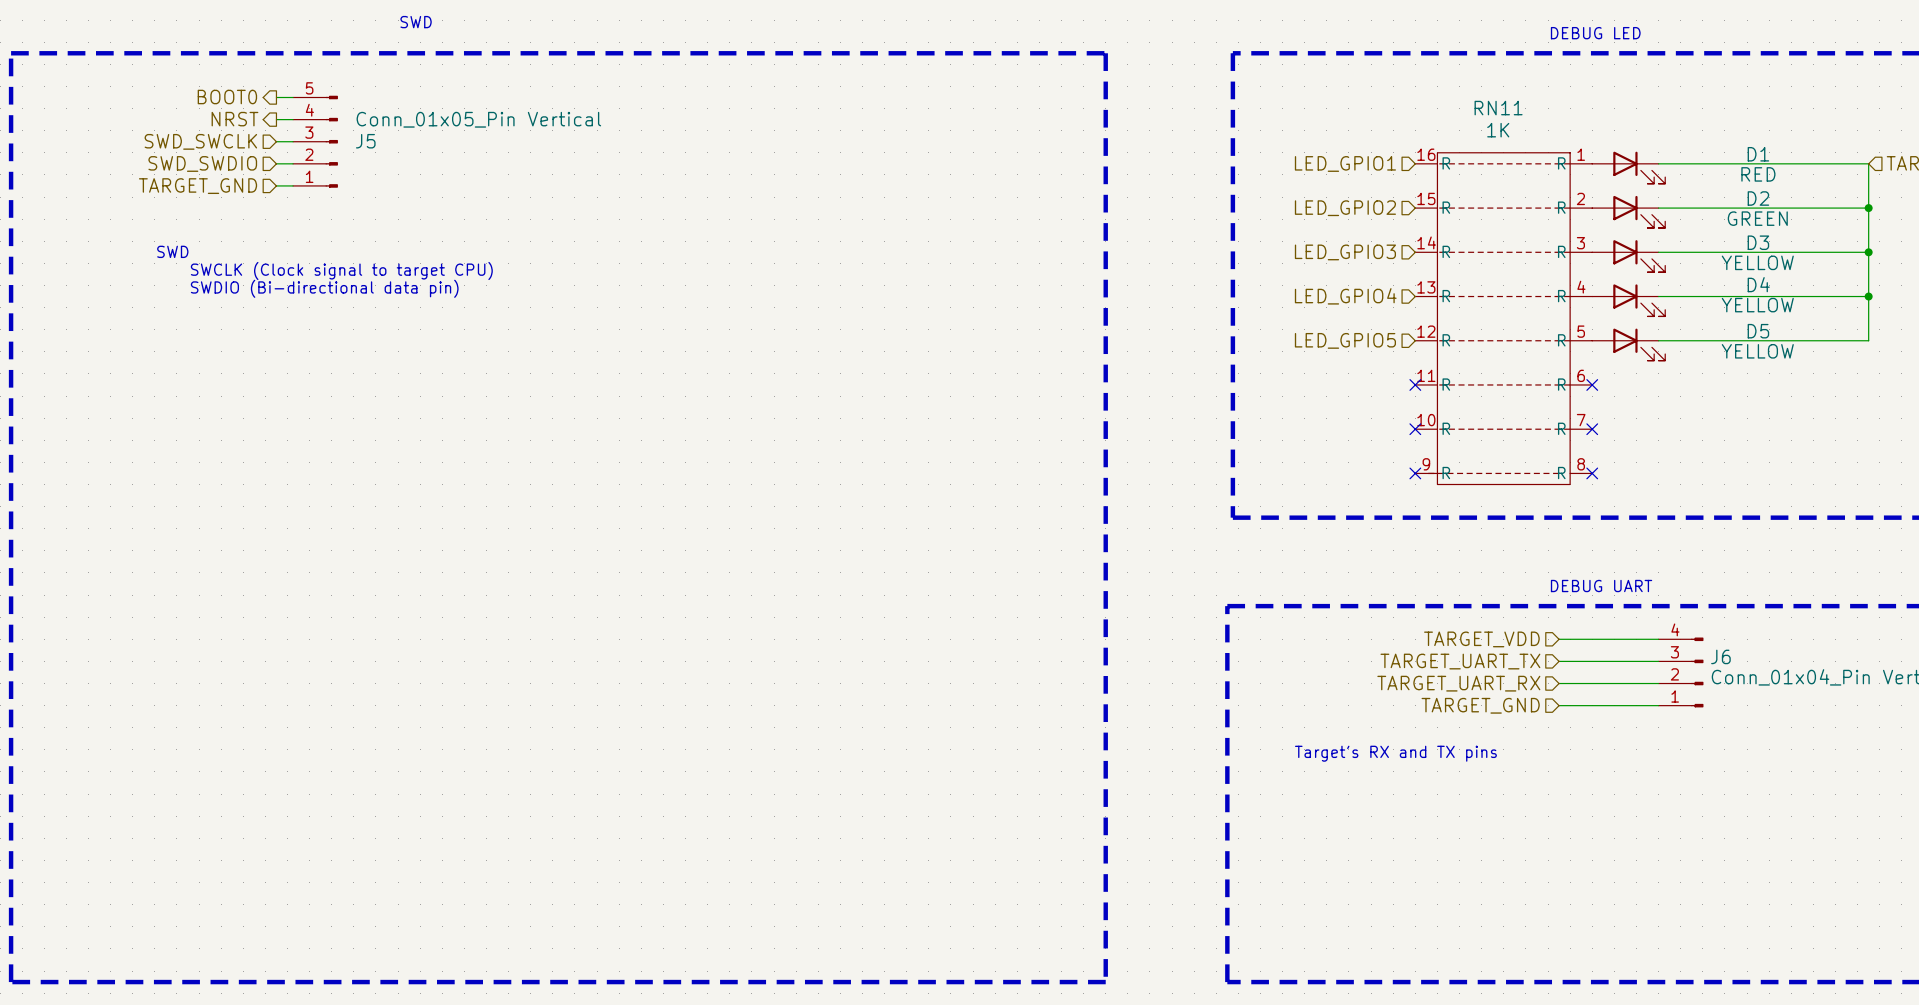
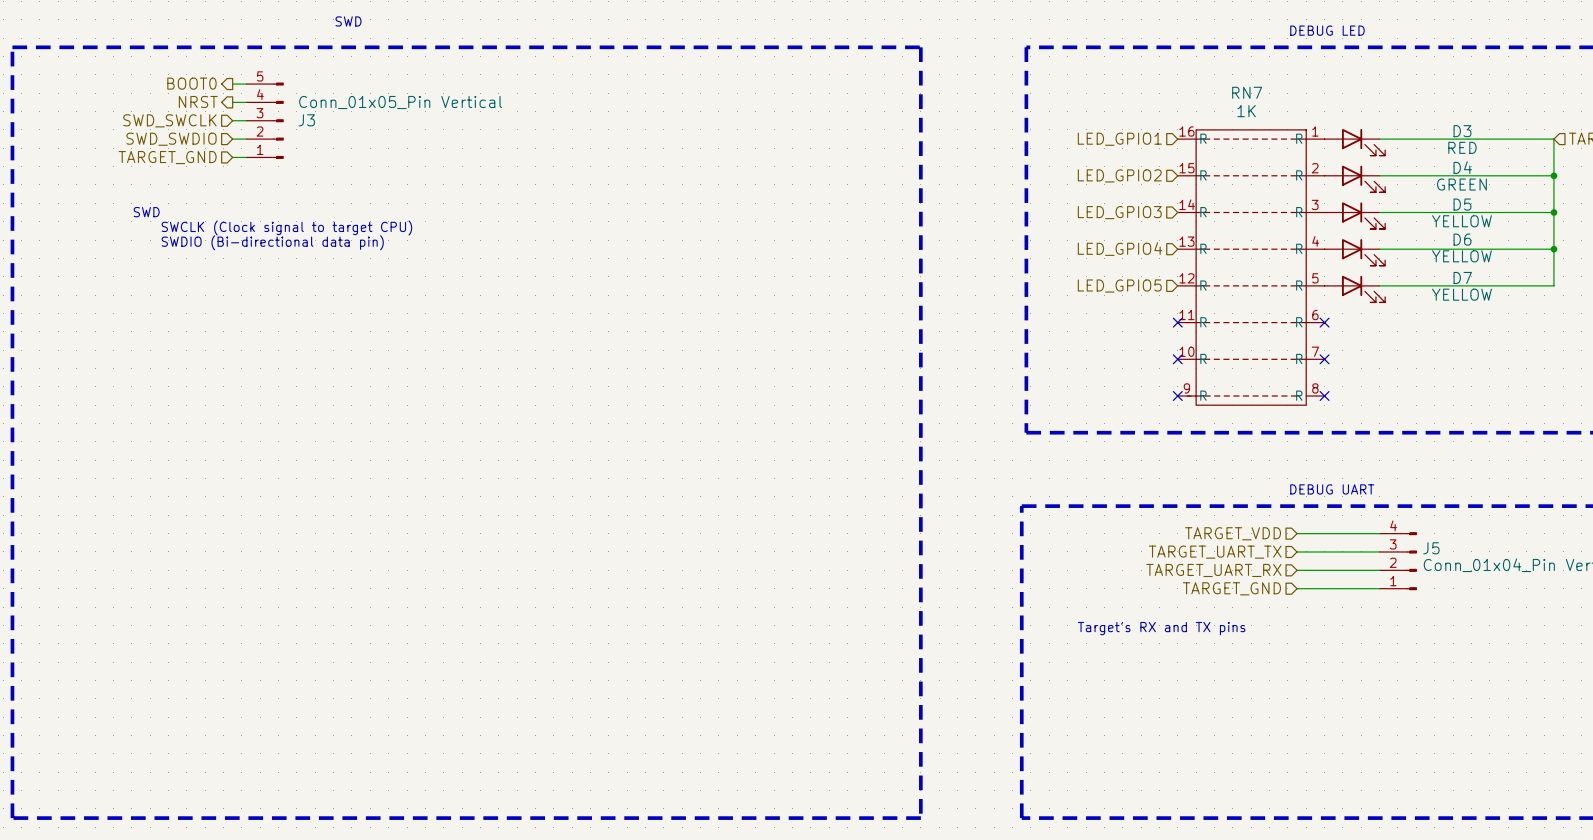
RN11 name: RN11 (1498, 108) -> RN7 (1247, 92)
J5 name: J5 (365, 141) -> J3 (306, 120)
D1 name: D1 (1758, 154) -> D3 (1462, 131)
D2 name: D2 (1758, 198) -> D4 (1462, 167)
D3 name: D3 (1758, 242) -> D5 (1462, 204)
D4 name: D4 (1758, 284) -> D6 (1462, 239)
D5 name: D5 (1758, 331) -> D7 (1462, 277)
J6 name: J6 (1720, 656) -> J5 (1431, 548)

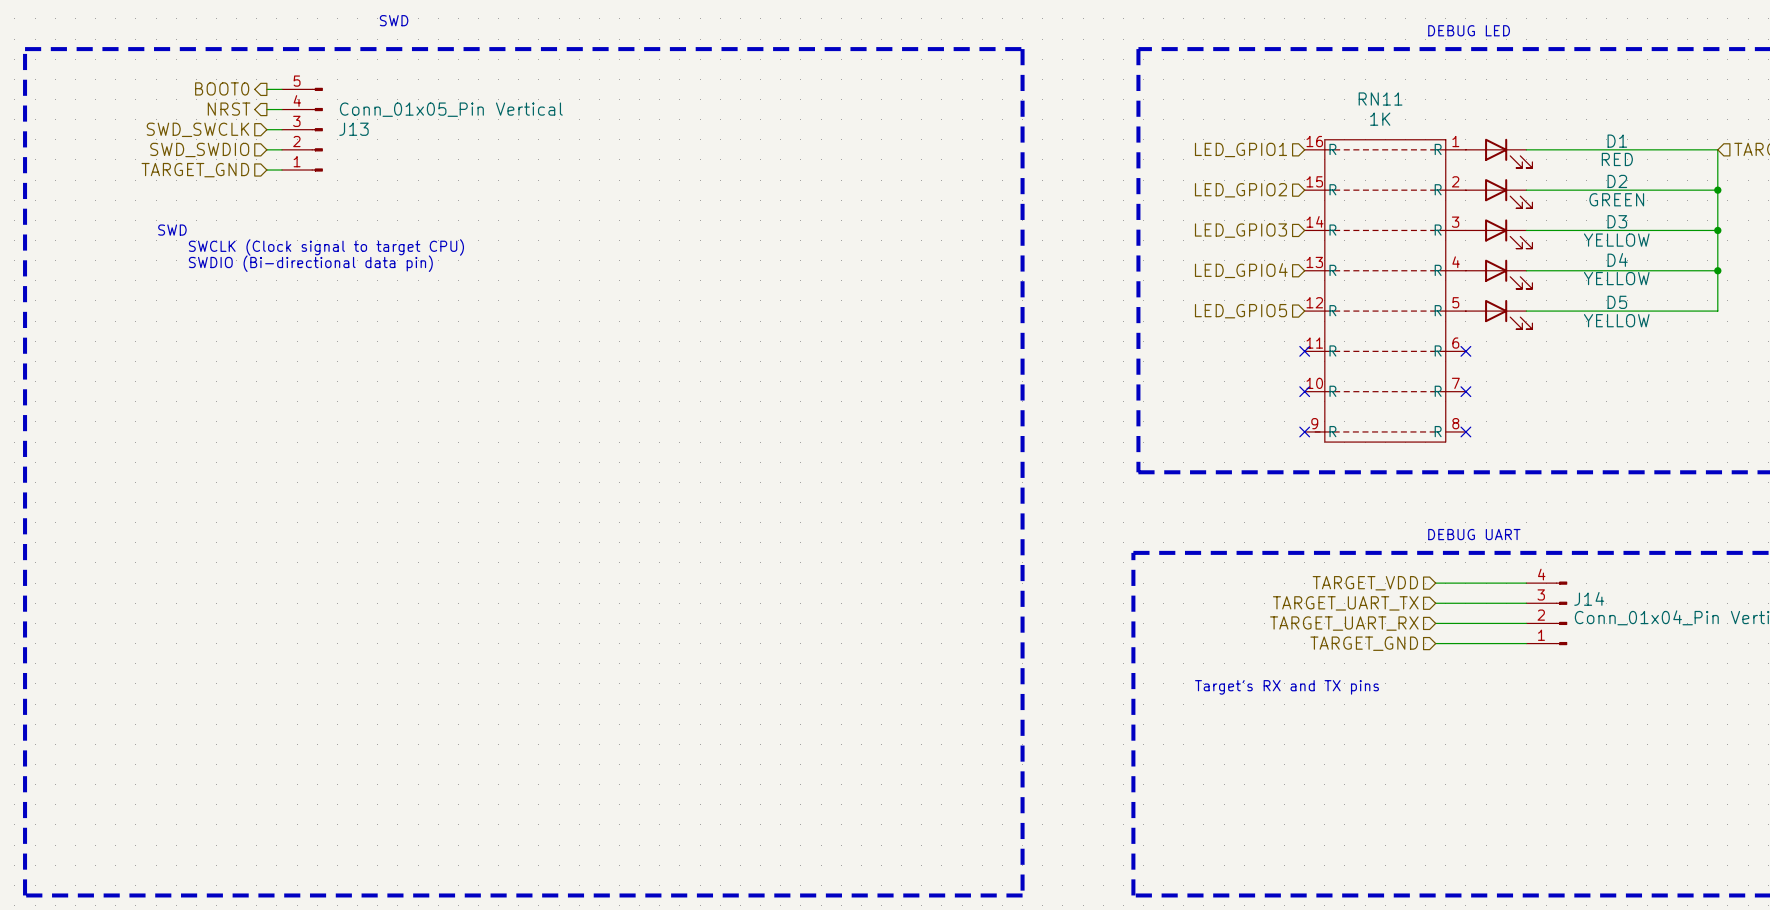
RN7 name: RN7 (1247, 92) -> RN11 (1380, 99)
J3 name: J3 (306, 120) -> J13 (354, 129)
D3 name: D3 (1462, 131) -> D1 (1617, 141)
D4 name: D4 (1462, 167) -> D2 (1617, 181)
D5 name: D5 (1462, 204) -> D3 (1617, 221)
D6 name: D6 (1462, 239) -> D4 (1617, 259)
D7 name: D7 (1462, 277) -> D5 (1617, 302)
J5 name: J5 (1431, 548) -> J14 (1589, 598)

